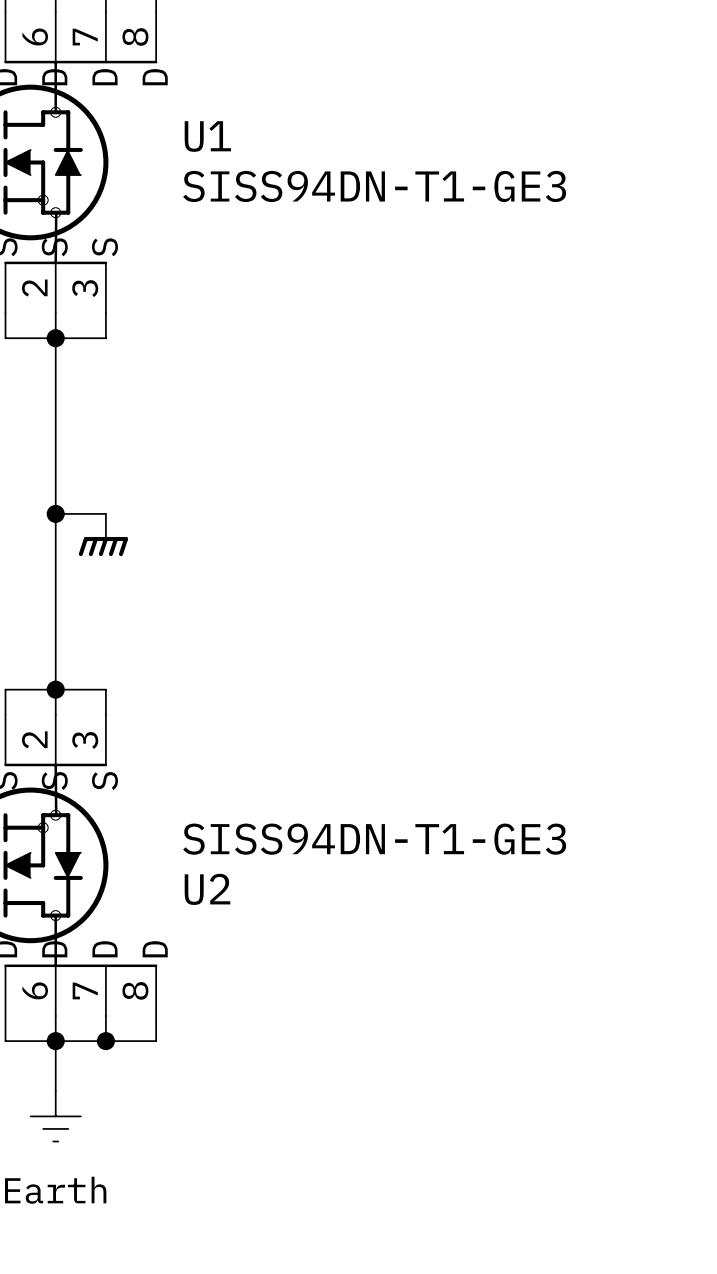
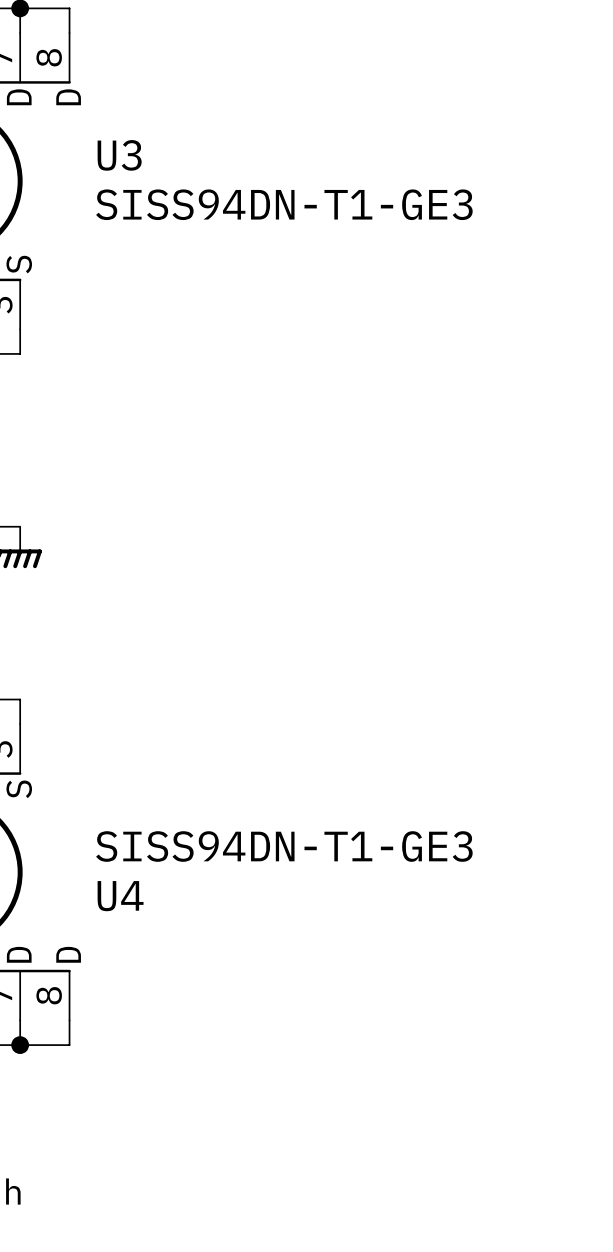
U1 name: U1 (207, 136) -> U3 (119, 155)
U2 name: U2 (207, 889) -> U4 (120, 896)

